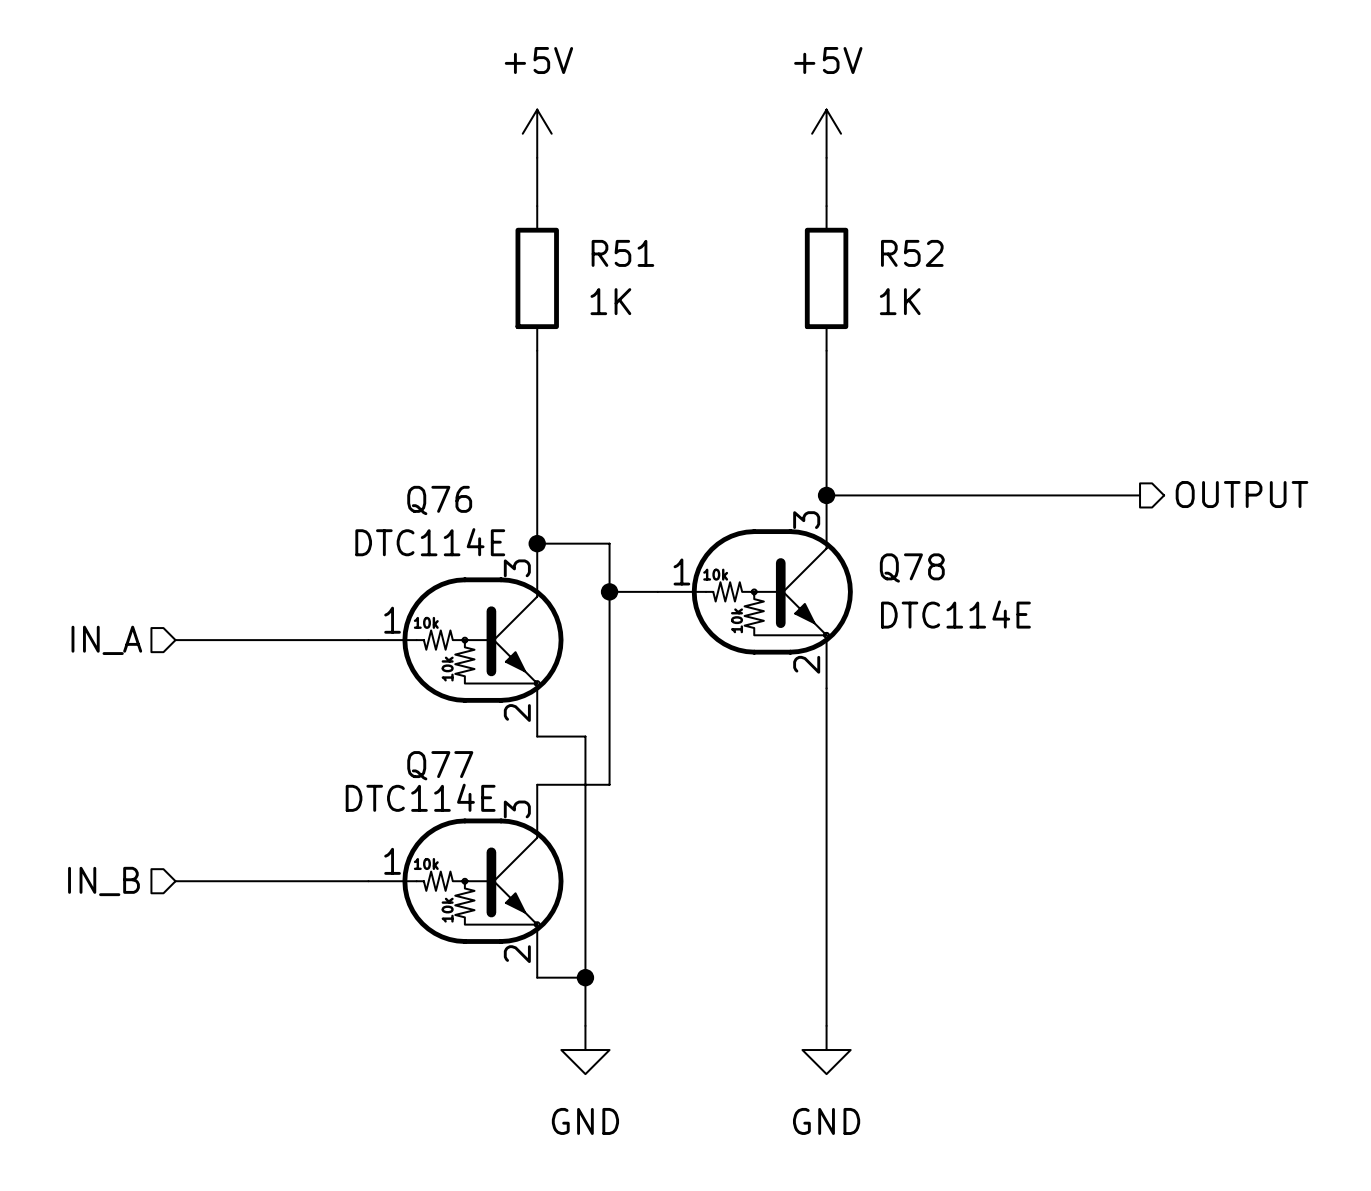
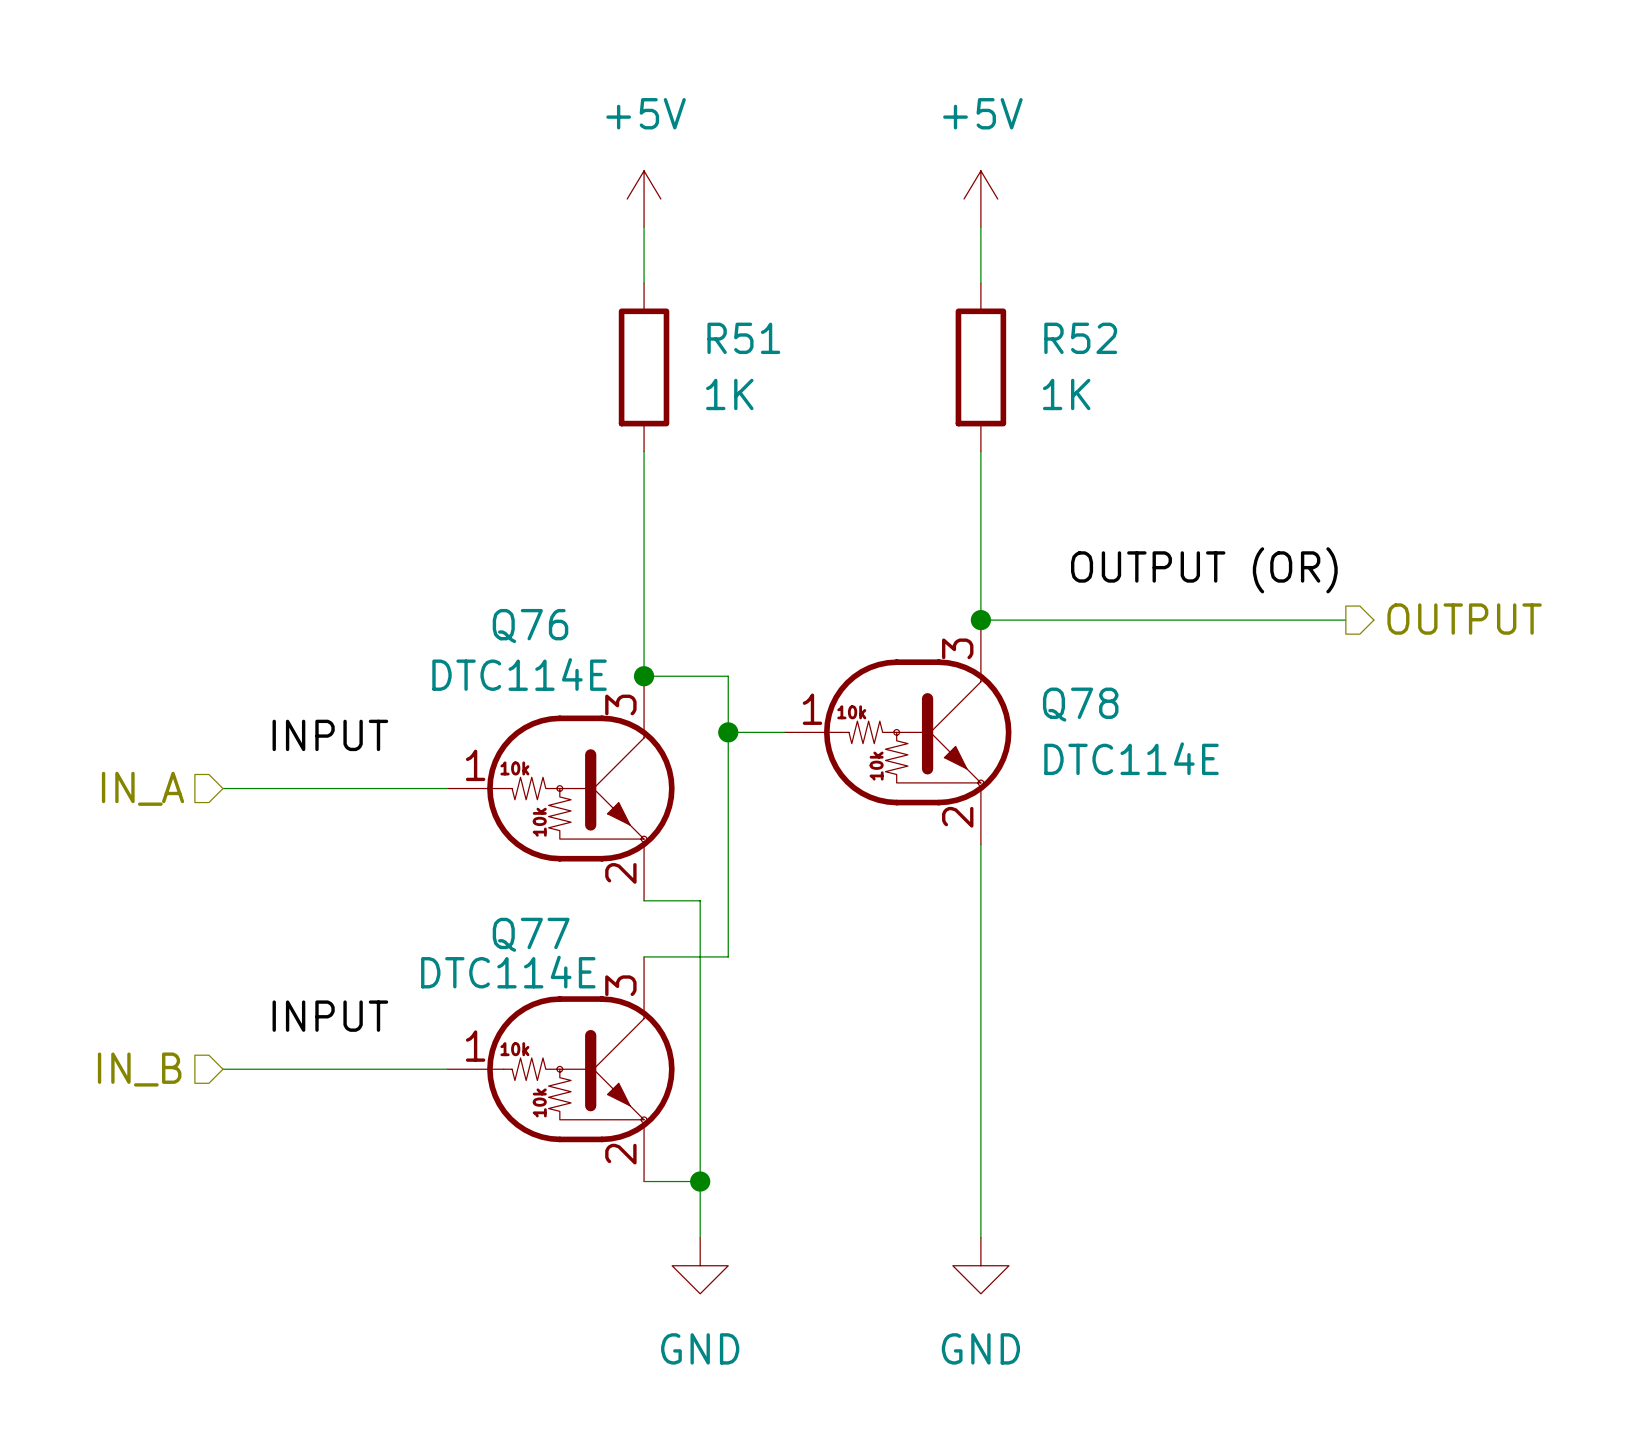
label: none -> OUTPUT (OR) (1204, 570)
label: none -> INPUT (330, 735)
label: none -> INPUT (330, 1016)

